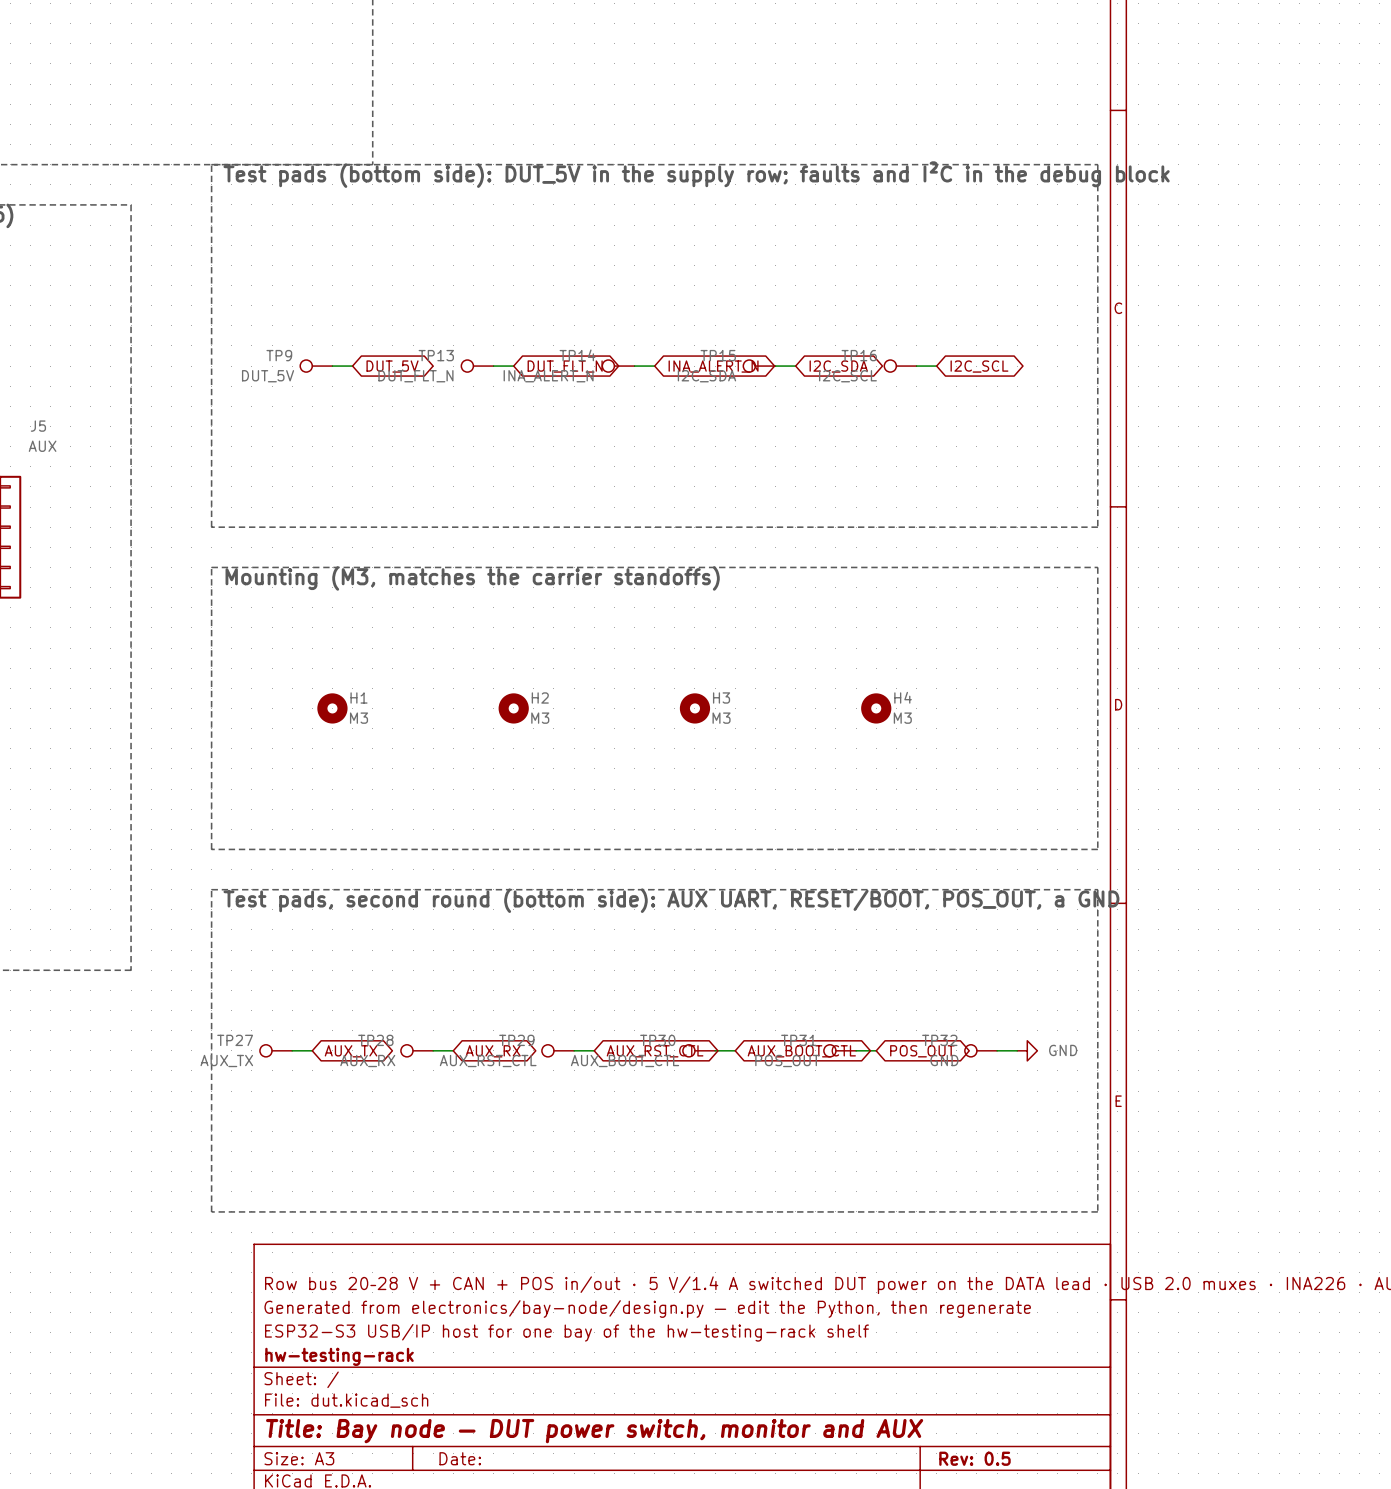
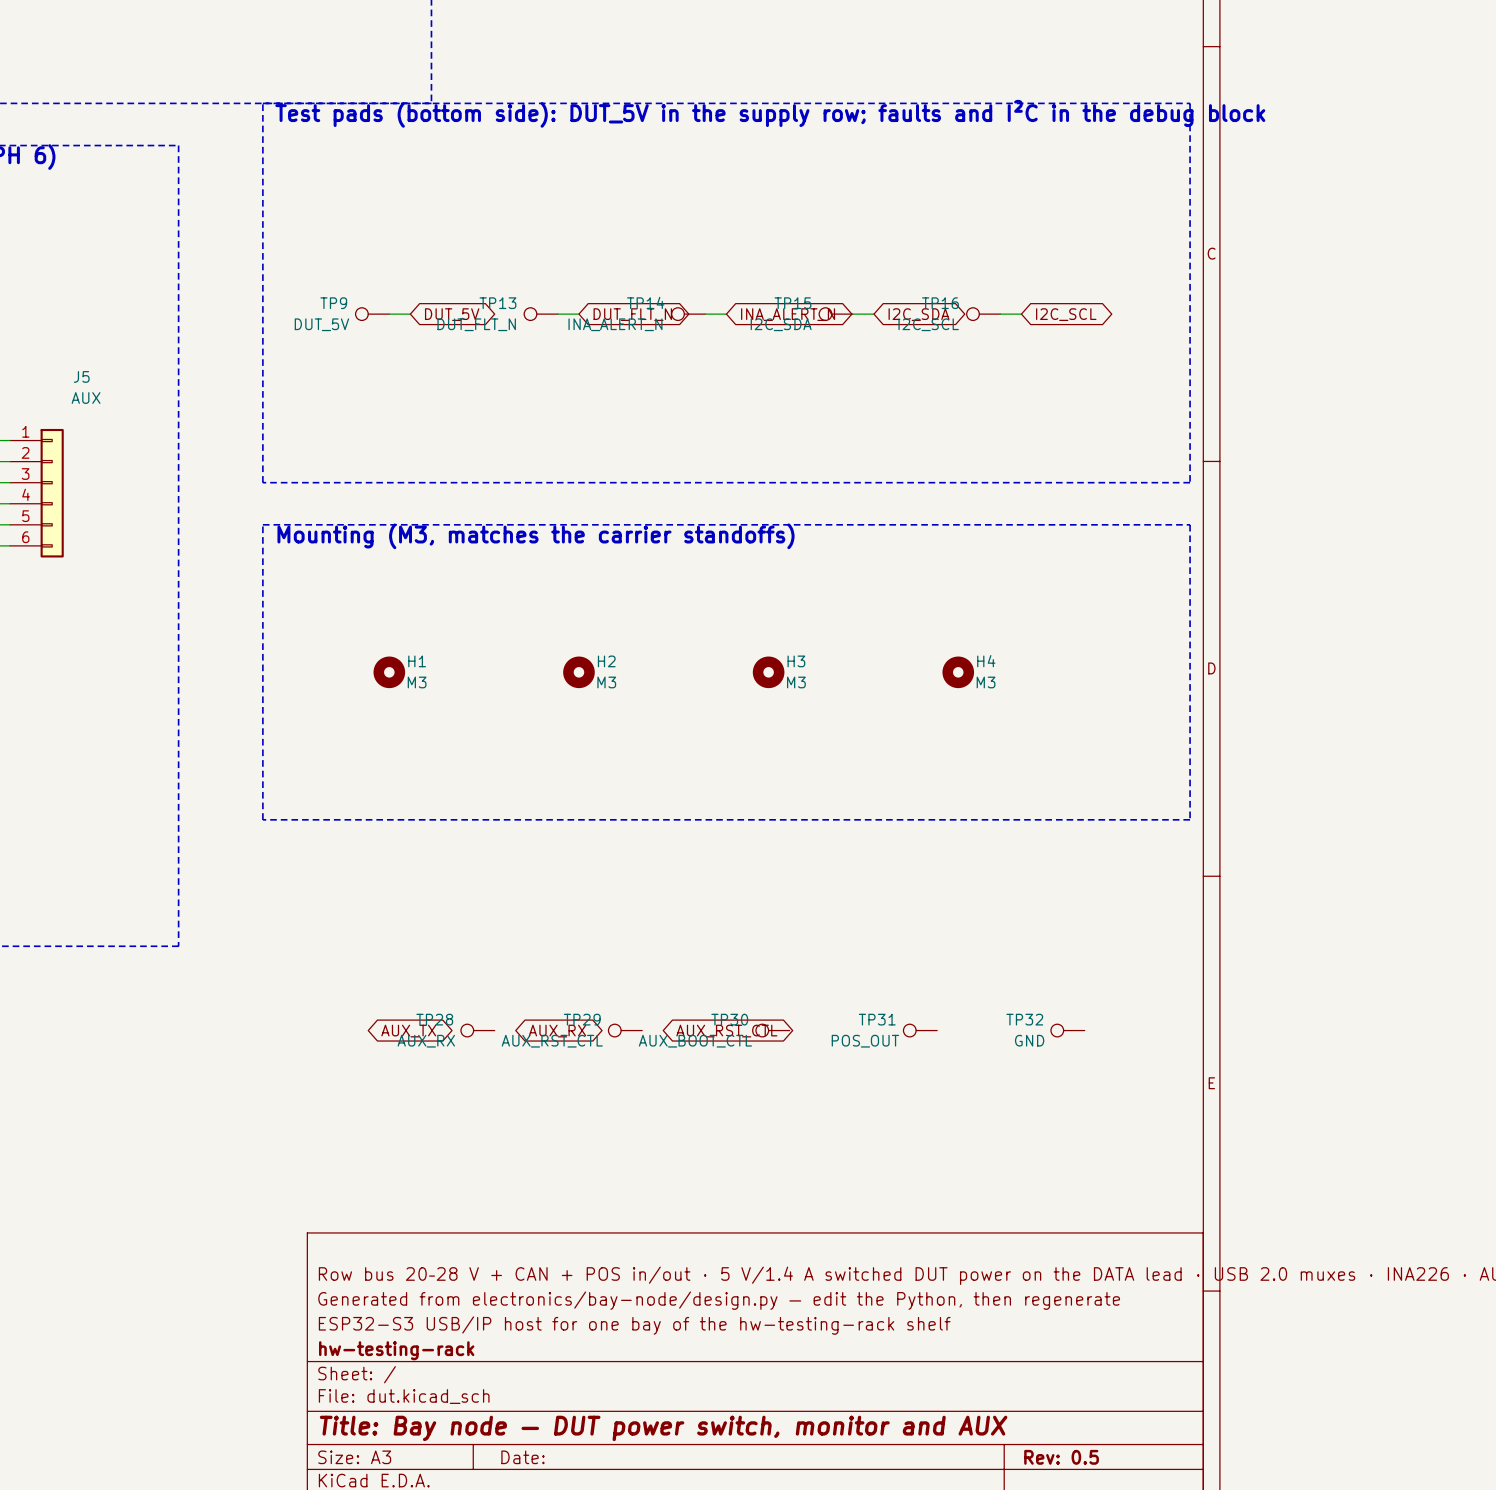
line: (211, 889) (1097, 889) (1097, 1211) (211, 1211) (211, 889) -> none
text: Test pads, second round (bottom side): AUX UART, RESET/BOOT, POS_OUT, a GND (671, 900) -> none
TP27: AUX_TX (276, 1050) -> none
wire: (292, 1050) (312, 1050) -> none
wire: (433, 1050) (453, 1050) -> none
wire: (574, 1050) (594, 1050) -> none
wire: (715, 1050) (735, 1050) -> none
wire: (856, 1050) (876, 1050) -> none
wire: (997, 1050) (1017, 1050) -> none
power symbol: GND (1027, 1050) -> none
global label: AUX_BOOT_CTL (801, 1051) -> none
global label: POS_OUT (922, 1051) -> none

